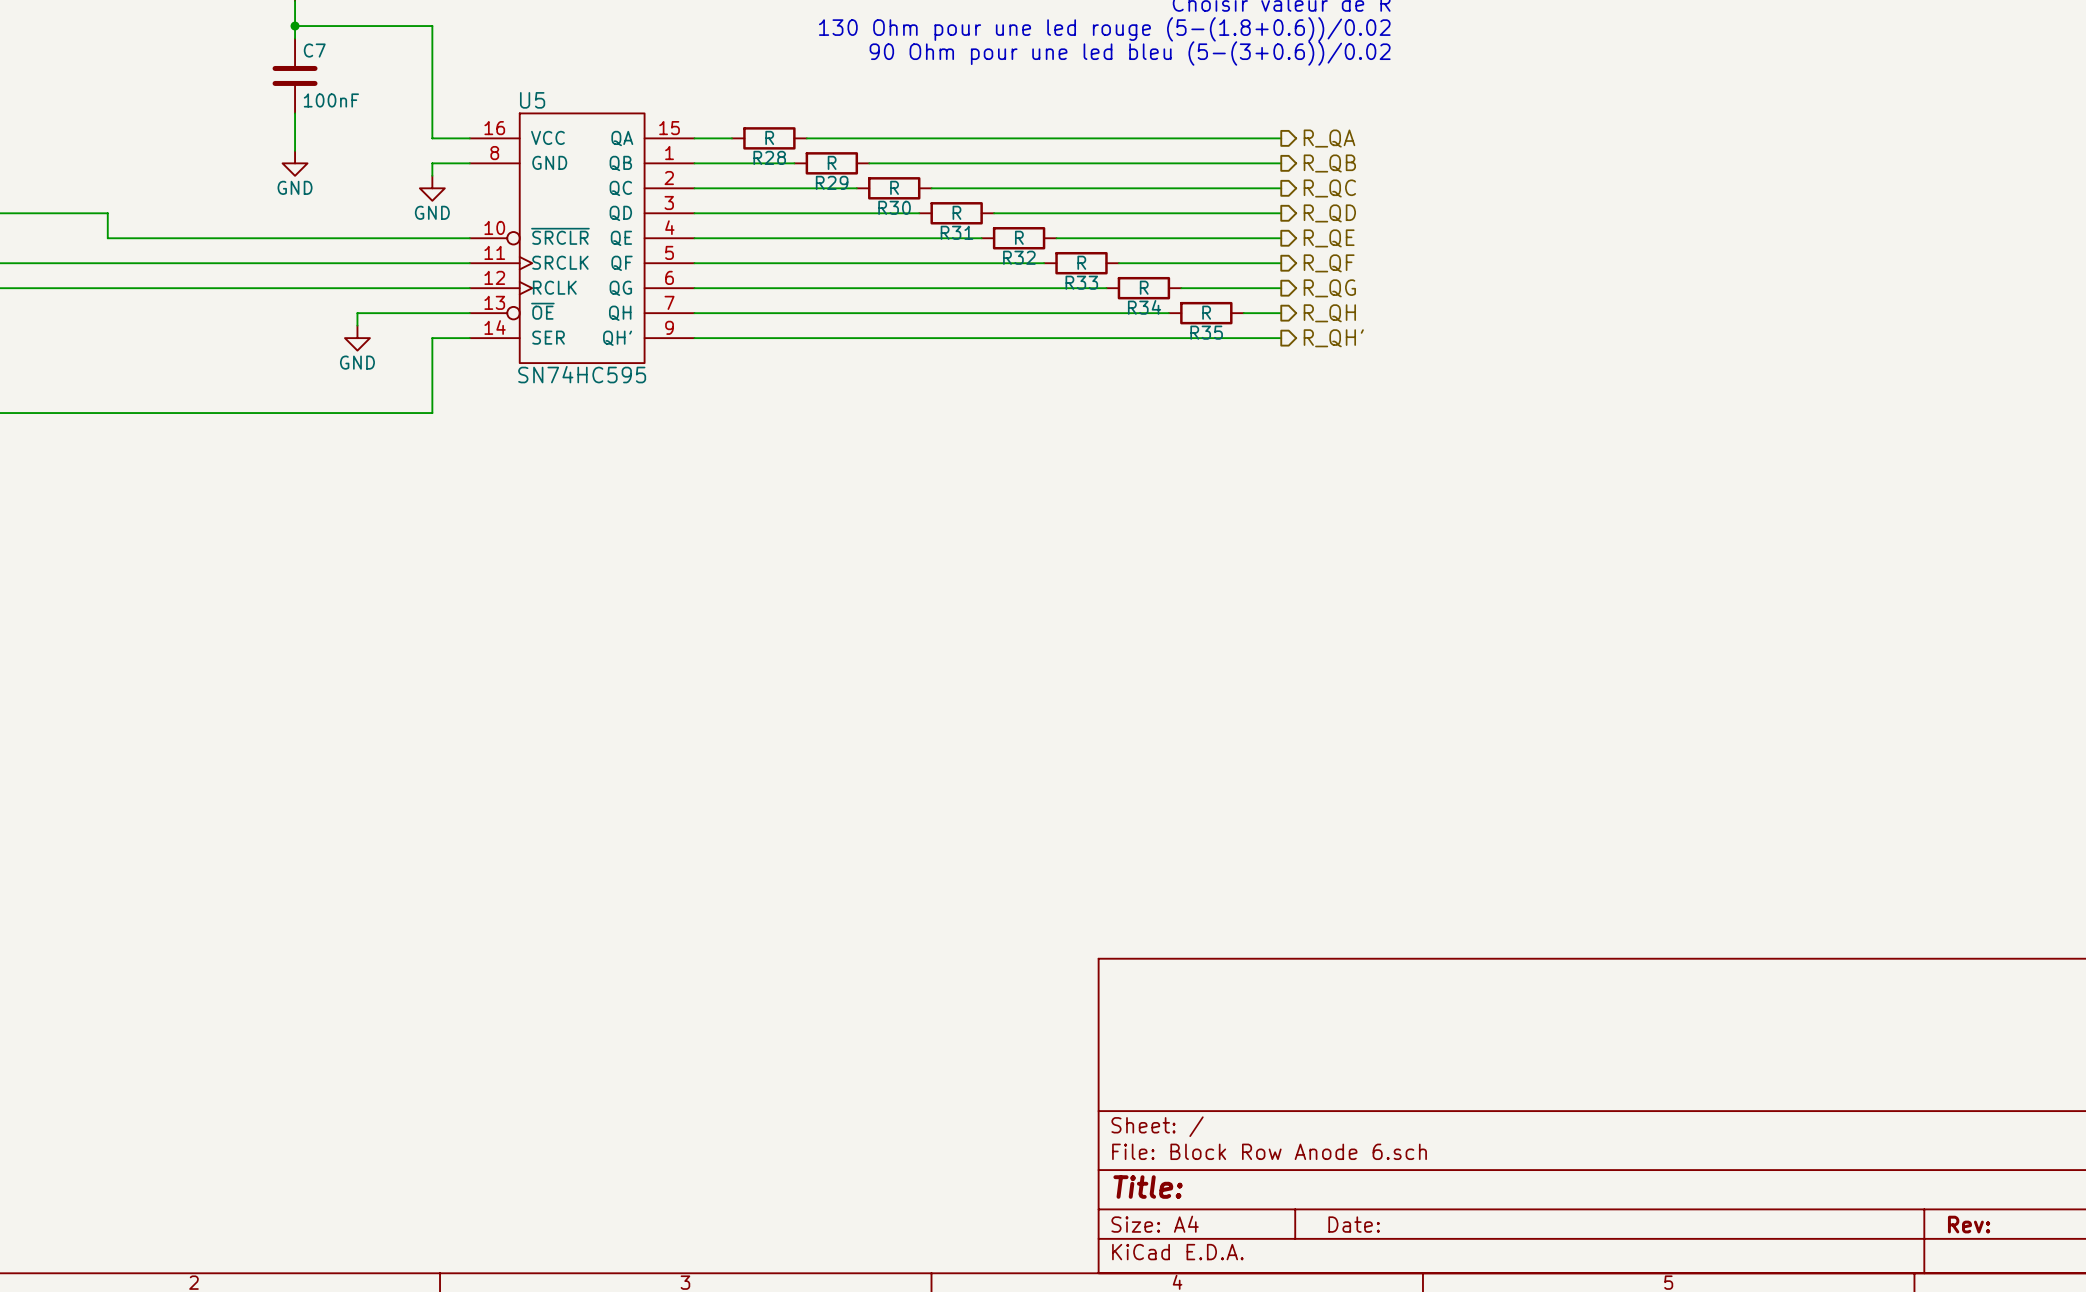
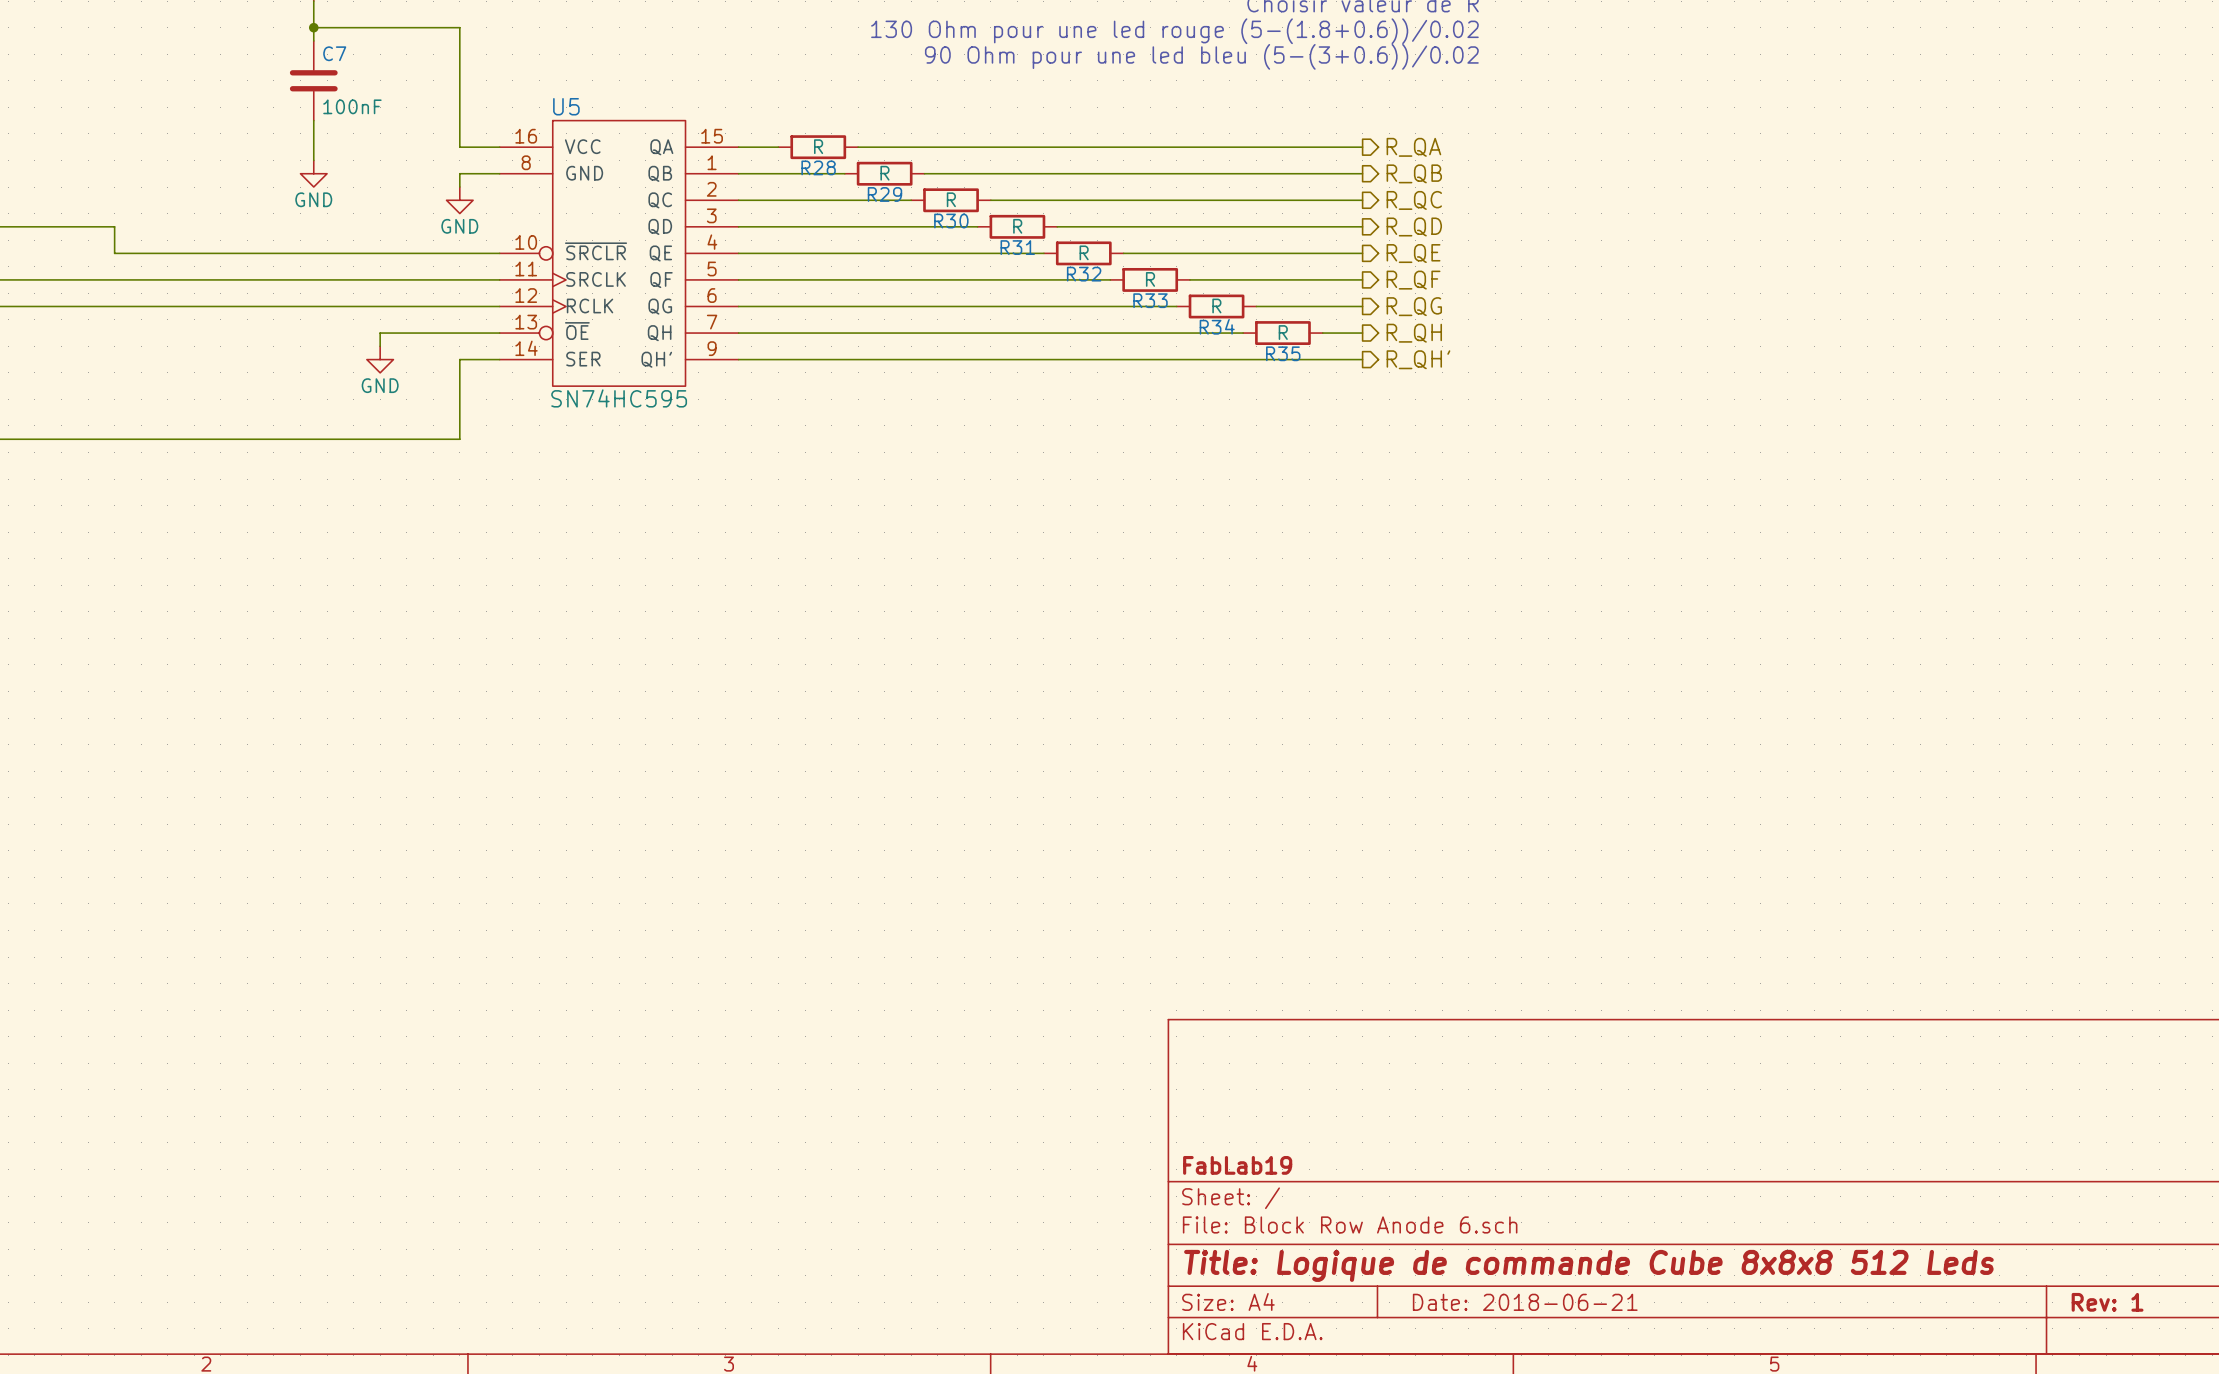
title block: none -> FabLab19 (1237, 1165)
title block: Title: (1148, 1187) -> Title: Logique de commande Cube 8x8x8 512 Leds (1588, 1265)
title block: Date: (1354, 1224) -> Date: 2018-06-21 (1525, 1302)
title block: Rev: (1969, 1224) -> Rev: 1 (2107, 1302)

